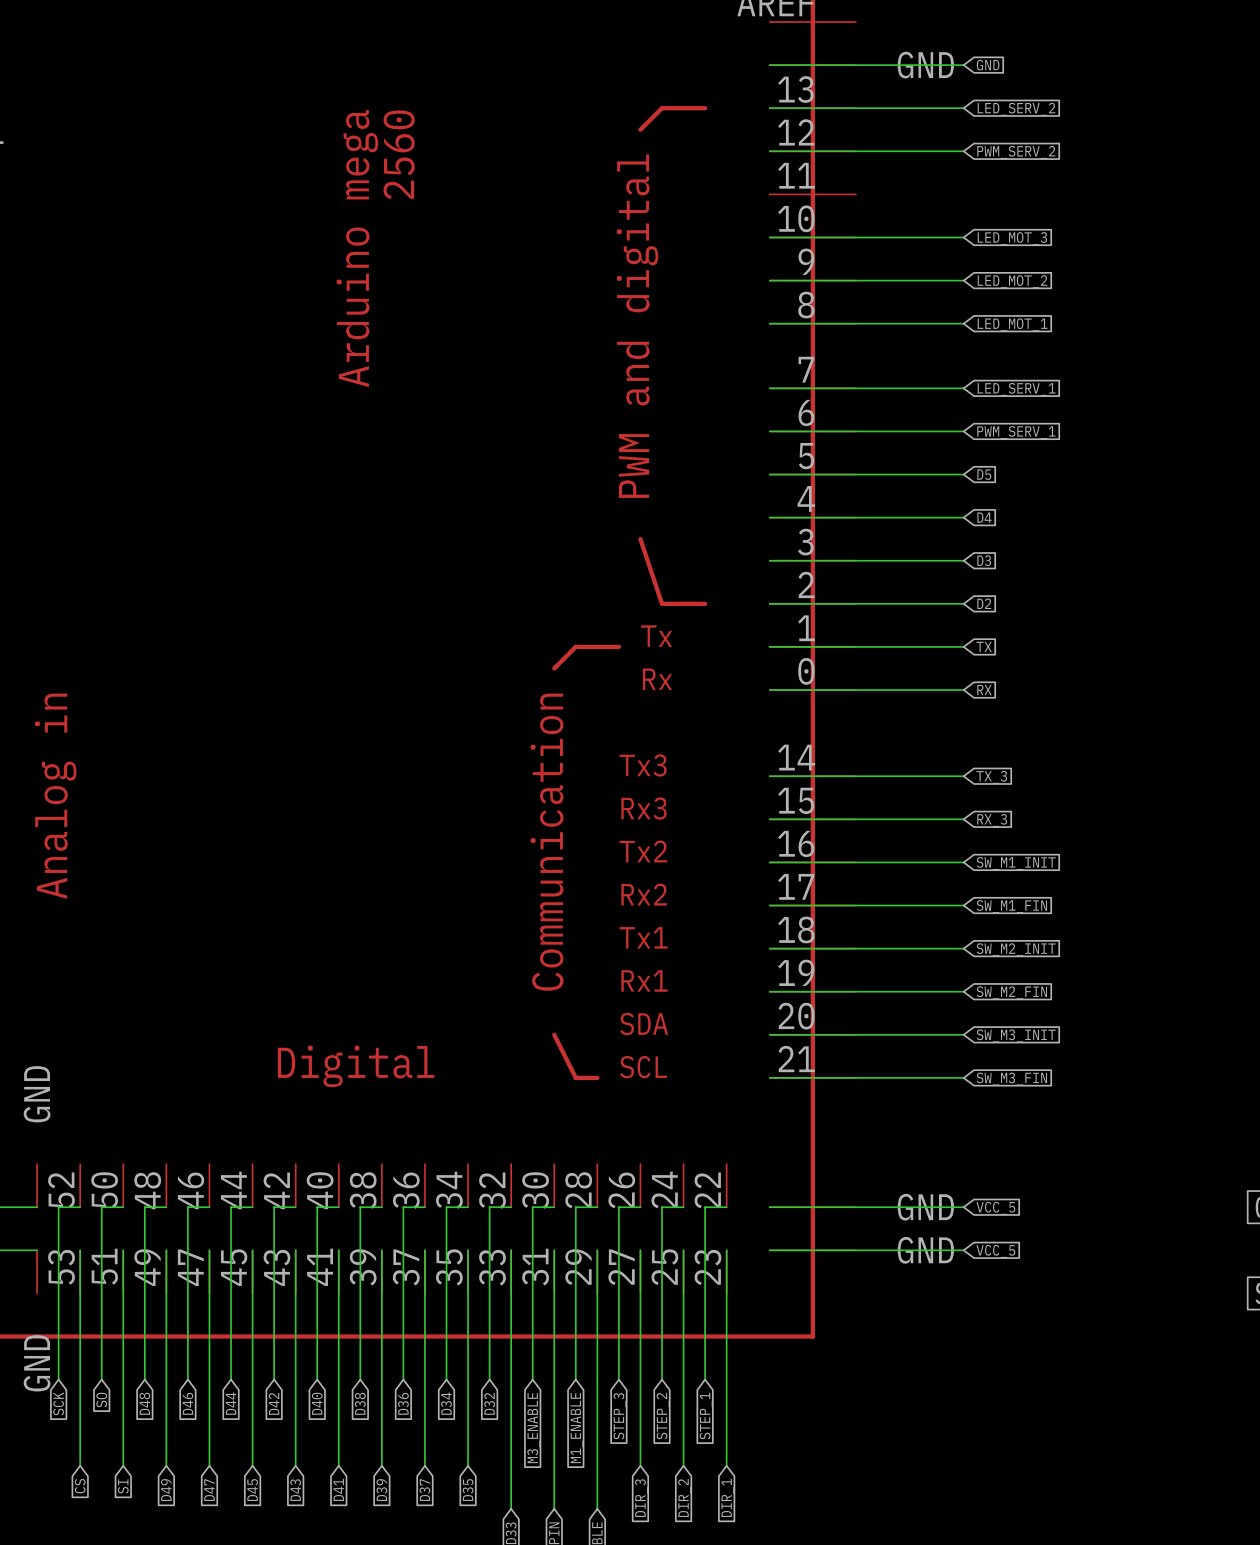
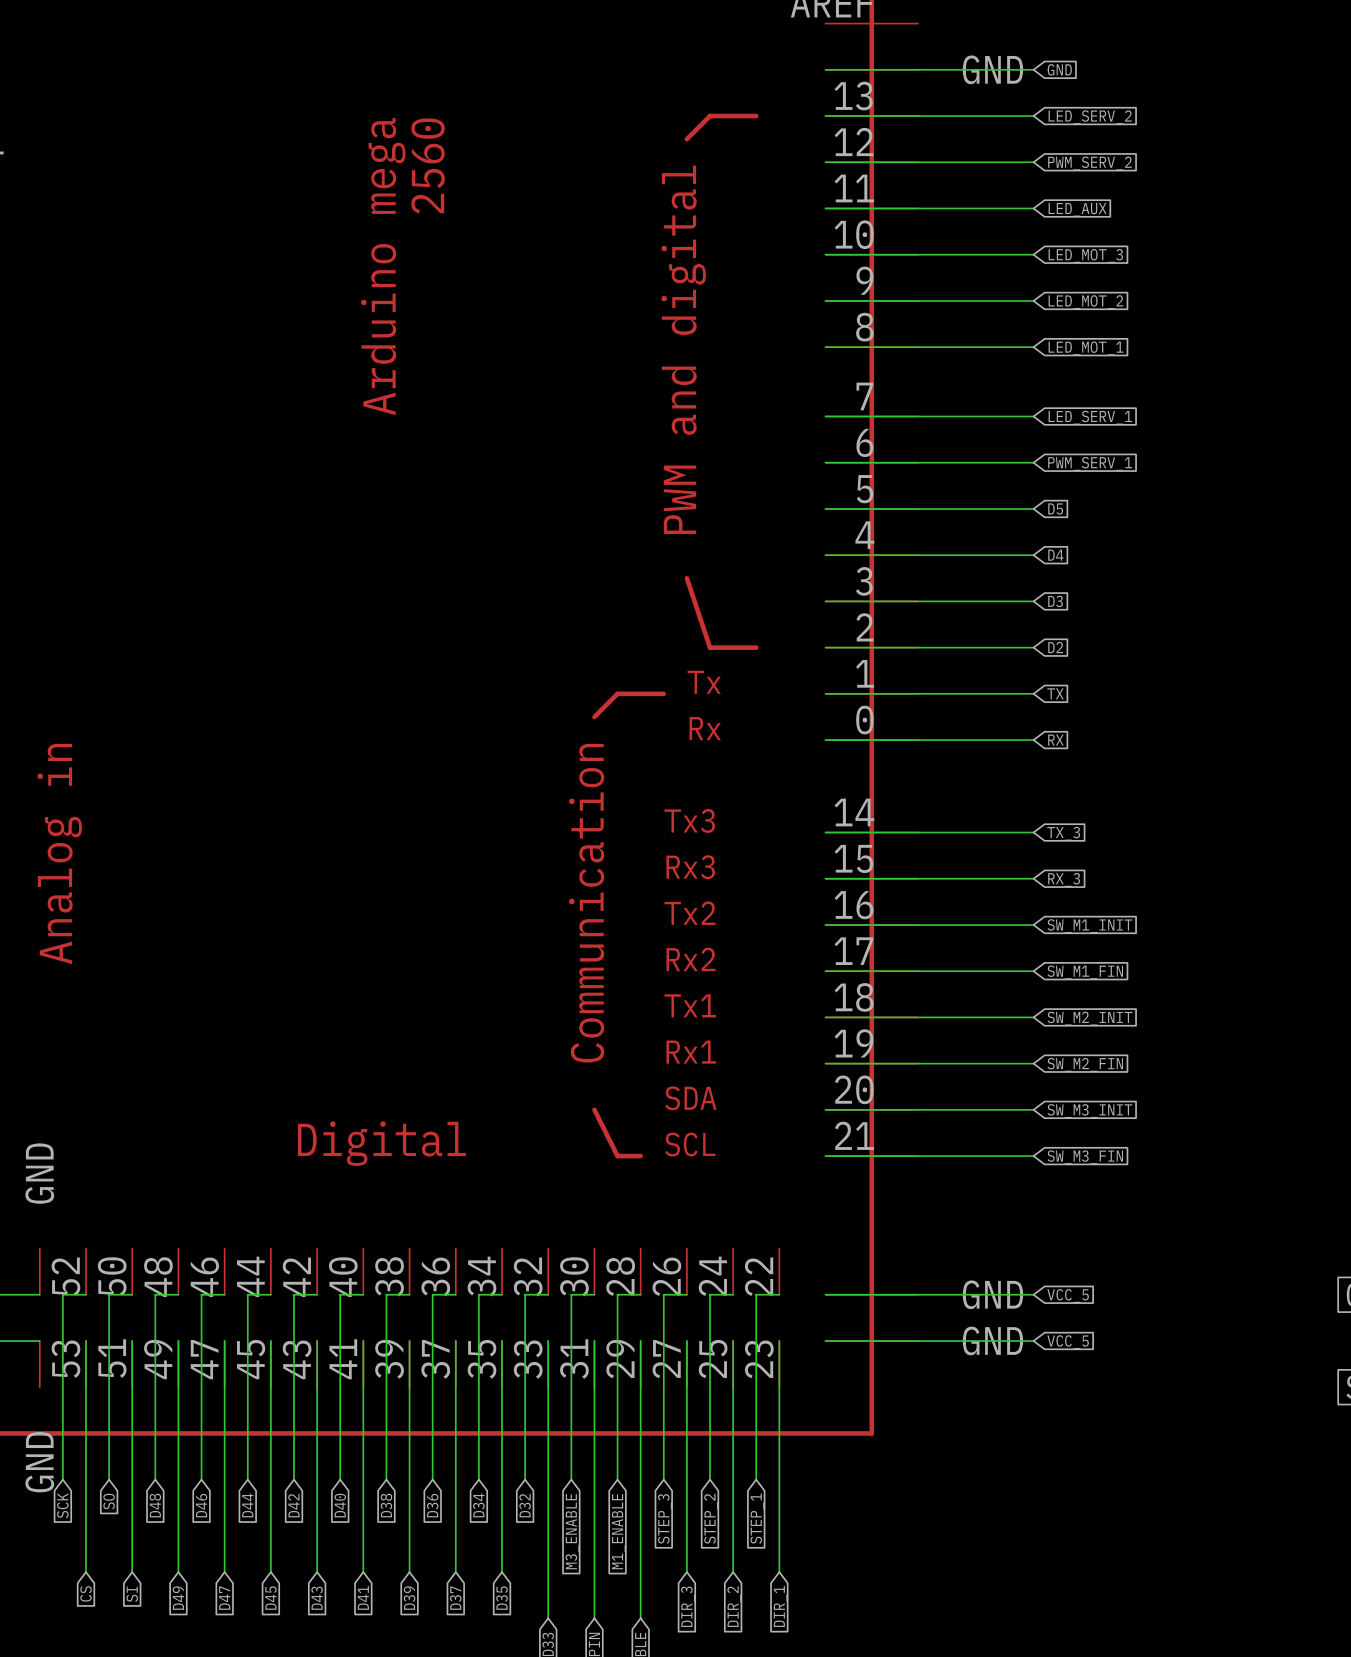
wire: none -> (825, 208) (1033, 208)
global label: none -> LED_AUX (1077, 209)

